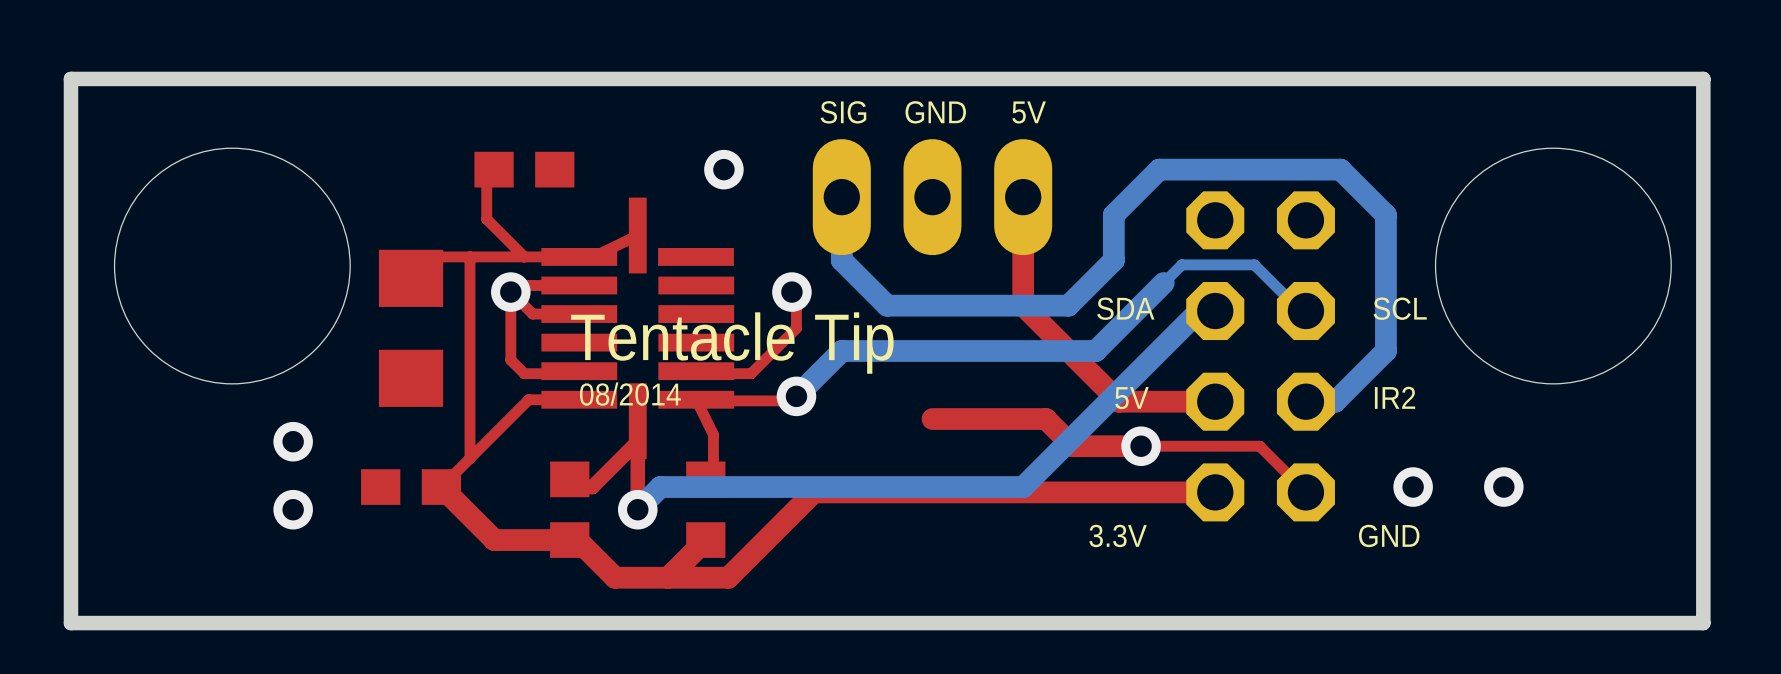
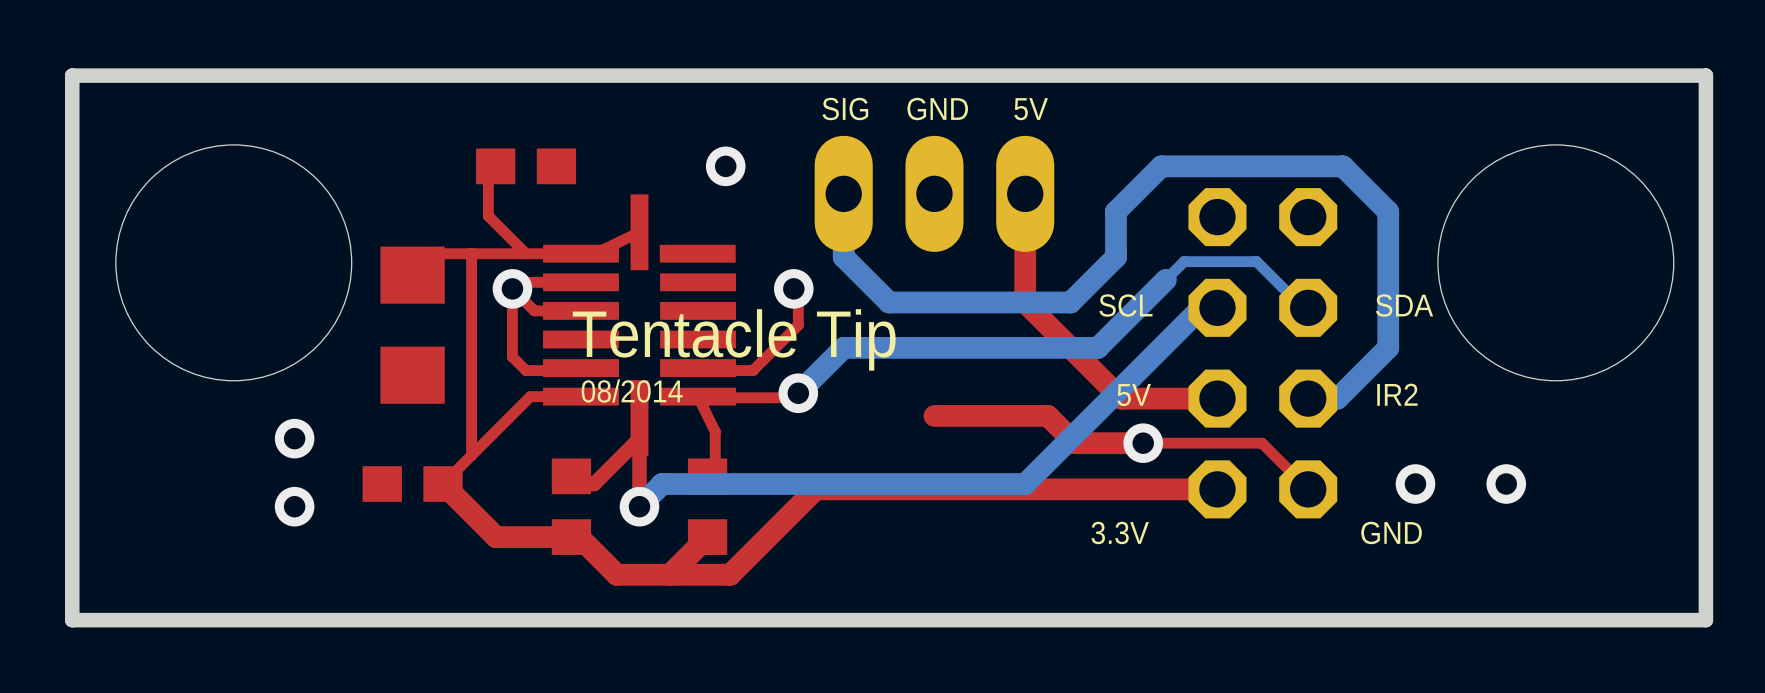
text: SDA (1125, 308) -> SCL (1125, 305)
text: SCL (1400, 308) -> SDA (1404, 305)

